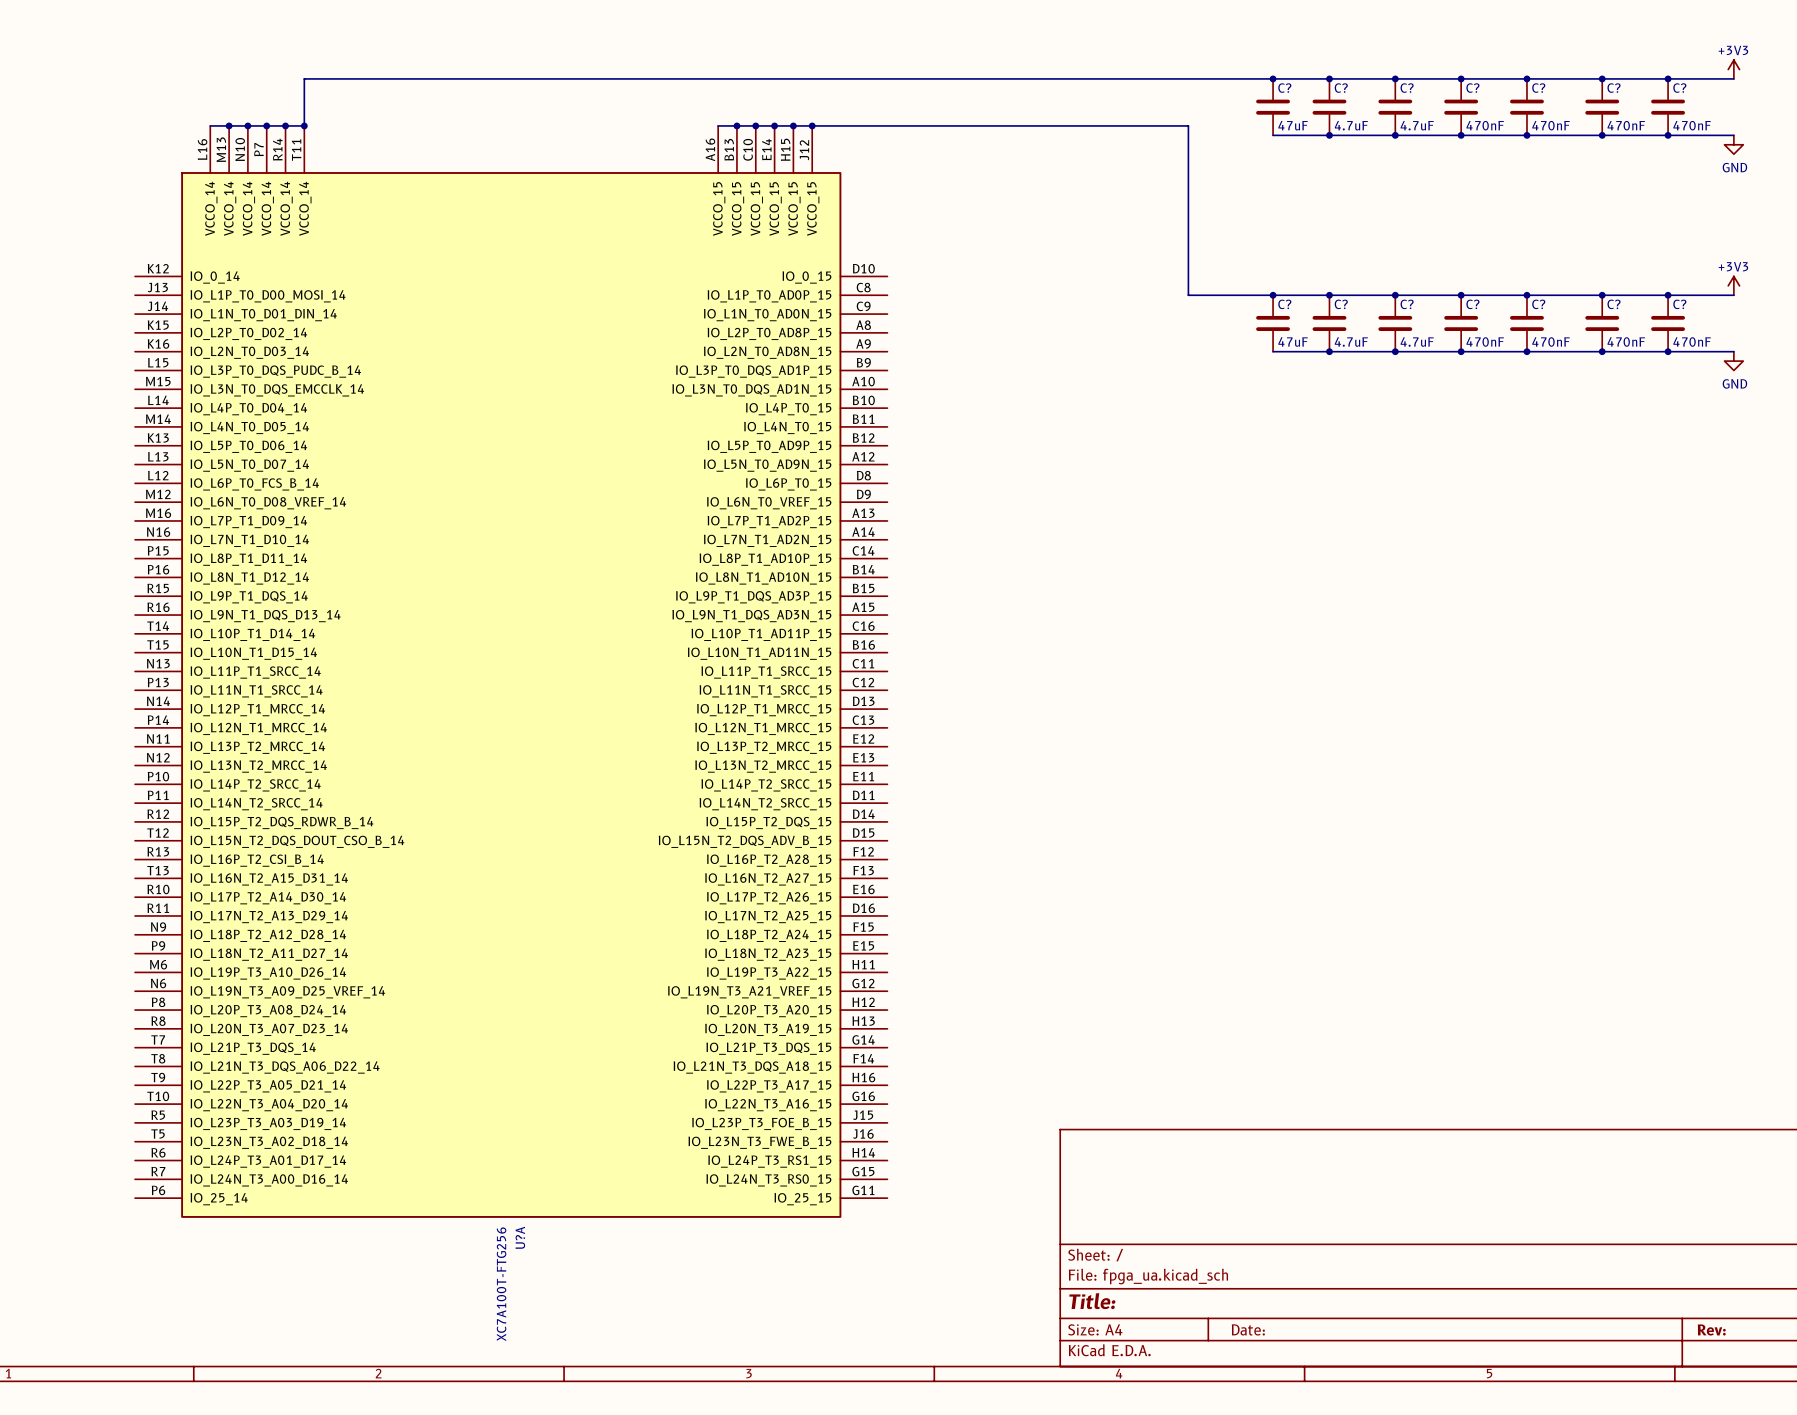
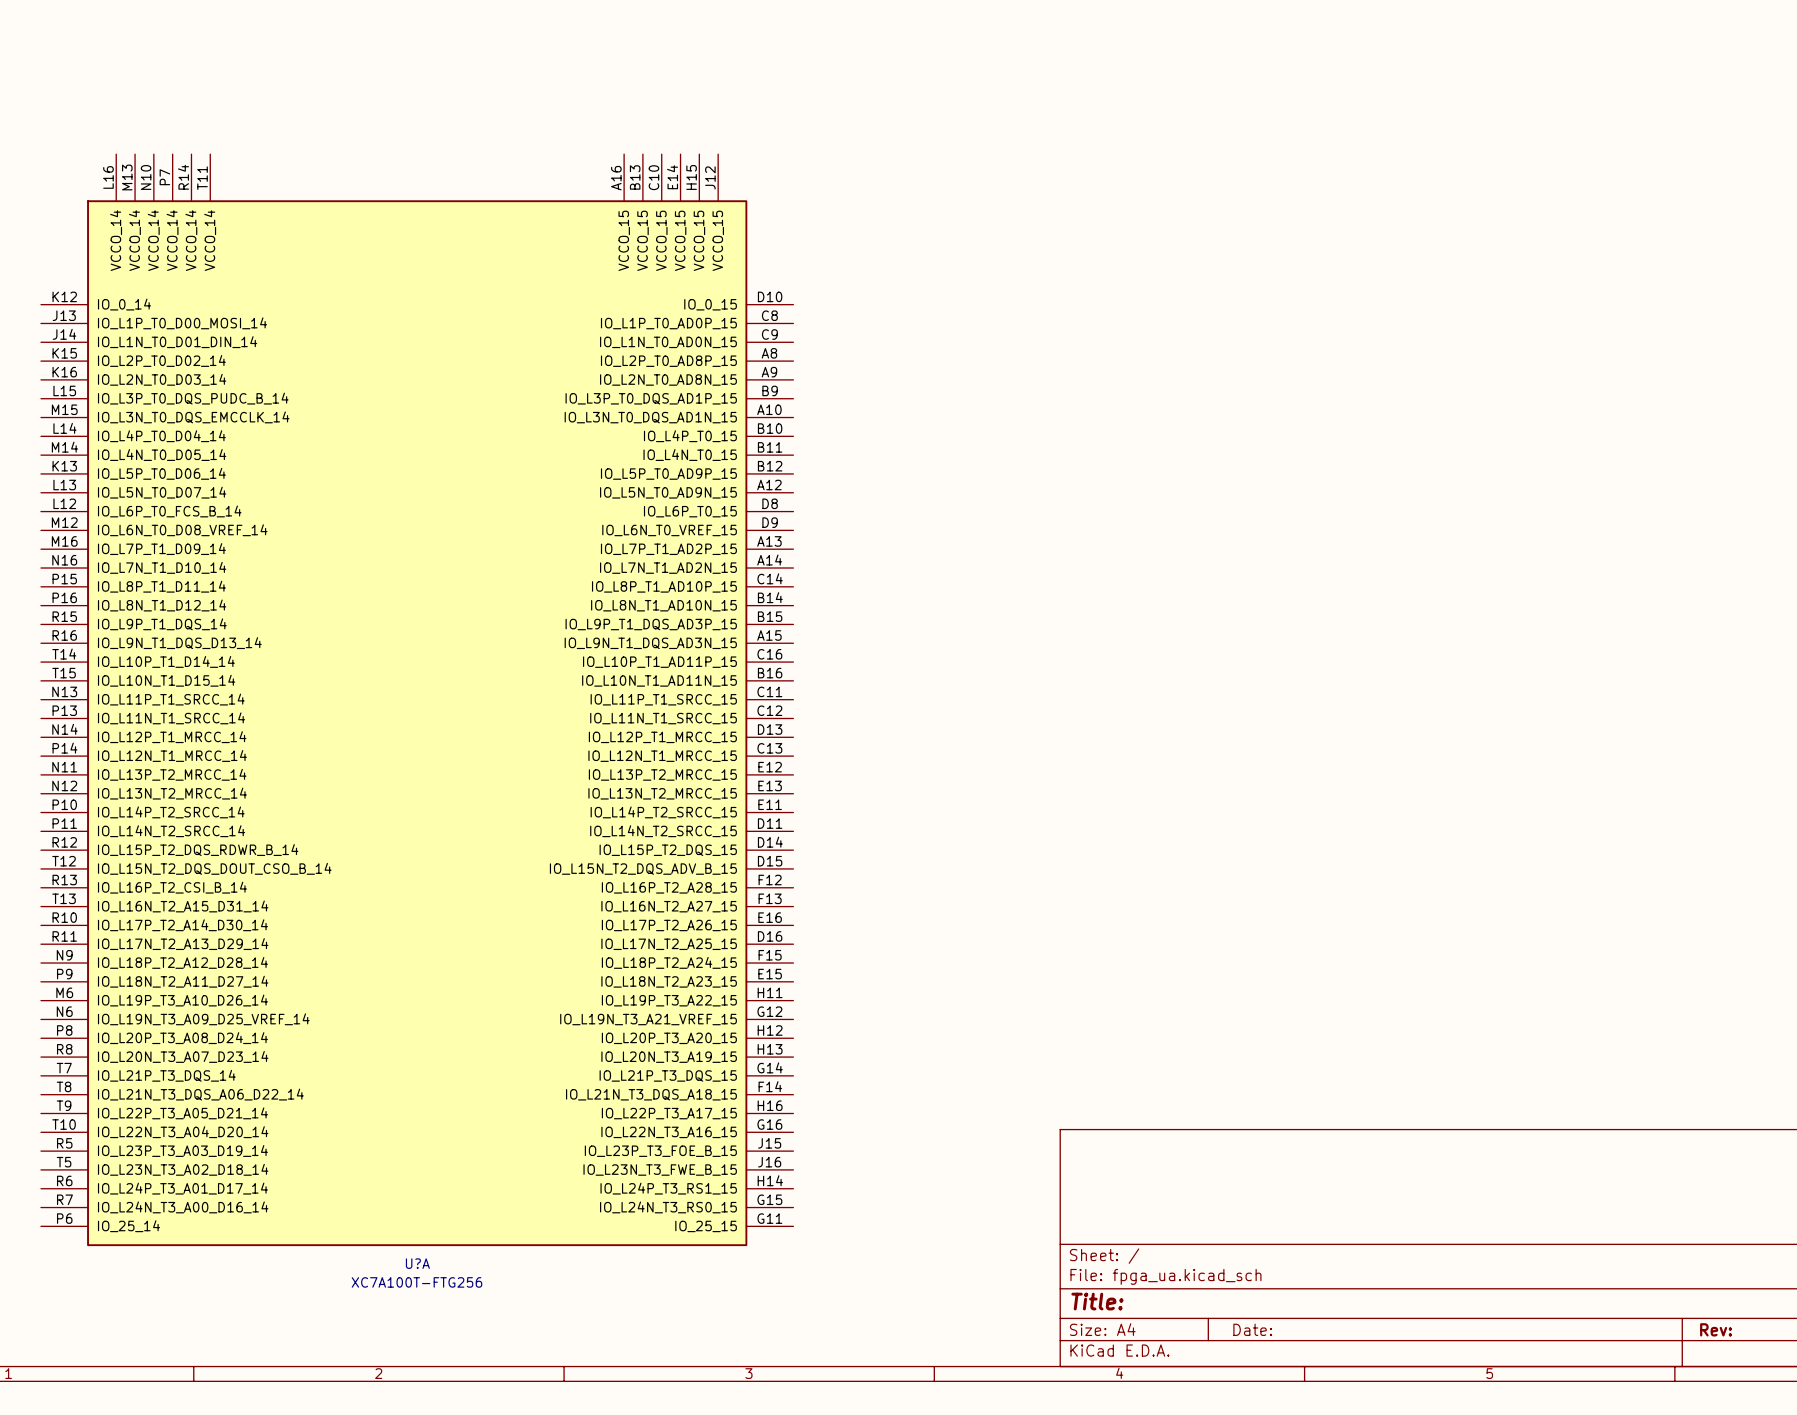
power symbol: +3V3 (1733, 69) -> none
junction: (1273, 78) -> none
junction: (1329, 78) -> none
junction: (1395, 78) -> none
junction: (1461, 78) -> none
junction: (1526, 78) -> none
junction: (1602, 78) -> none
junction: (1668, 78) -> none
wire: (1733, 78) (304, 78) (304, 125) (210, 125) -> none
C?: 47uF (1273, 107) -> none
C?: 4.7uF (1329, 107) -> none
C?: 4.7uF (1395, 107) -> none
C?: 470nF (1461, 107) -> none
C?: 470nF (1526, 107) -> none
C?: 470nF (1602, 107) -> none
C?: 470nF (1668, 107) -> none
junction: (229, 125) -> none
junction: (247, 125) -> none
junction: (266, 125) -> none
junction: (285, 125) -> none
junction: (304, 125) -> none
wire: (718, 125) (1188, 125) (1188, 295) (1733, 295) -> none
junction: (736, 125) -> none
junction: (755, 125) -> none
junction: (774, 125) -> none
junction: (793, 125) -> none
junction: (812, 125) -> none
wire: (1273, 135) (1733, 135) -> none
junction: (1329, 135) -> none
junction: (1395, 135) -> none
junction: (1461, 135) -> none
junction: (1526, 135) -> none
junction: (1602, 135) -> none
junction: (1668, 135) -> none
power symbol: GND (1733, 144) -> none
power symbol: +3V3 (1733, 285) -> none
junction: (1273, 295) -> none
junction: (1329, 295) -> none
junction: (1395, 295) -> none
junction: (1461, 295) -> none
junction: (1526, 295) -> none
junction: (1602, 295) -> none
junction: (1668, 295) -> none
C?: 47uF (1273, 323) -> none
C?: 4.7uF (1329, 323) -> none
C?: 4.7uF (1395, 323) -> none
C?: 470nF (1461, 323) -> none
C?: 470nF (1526, 323) -> none
C?: 470nF (1602, 323) -> none
C?: 470nF (1668, 323) -> none
wire: (1273, 351) (1733, 351) -> none
junction: (1329, 351) -> none
junction: (1395, 351) -> none
junction: (1461, 351) -> none
junction: (1526, 351) -> none
junction: (1602, 351) -> none
junction: (1668, 351) -> none
power symbol: GND (1733, 361) -> none
U?A position: (511, 671) -> (417, 700)
U?A name rotation: 0° (520, 1237) -> 90° clockwise (417, 1263)
U?A value rotation: 0° (501, 1284) -> 90° clockwise (416, 1282)

